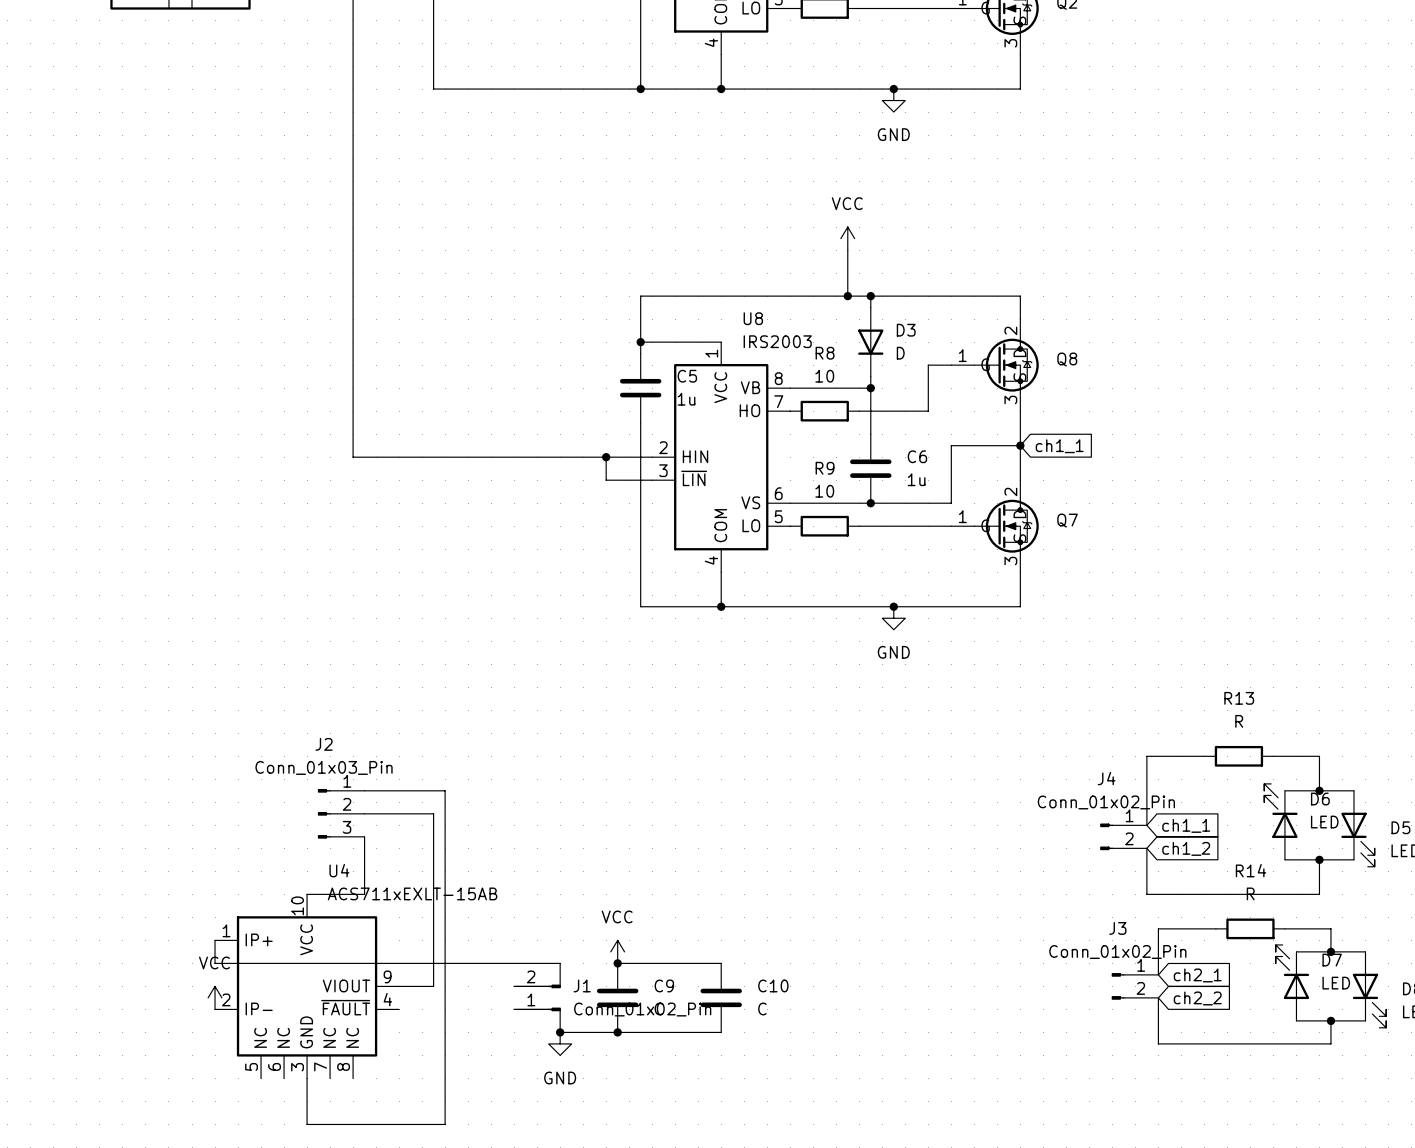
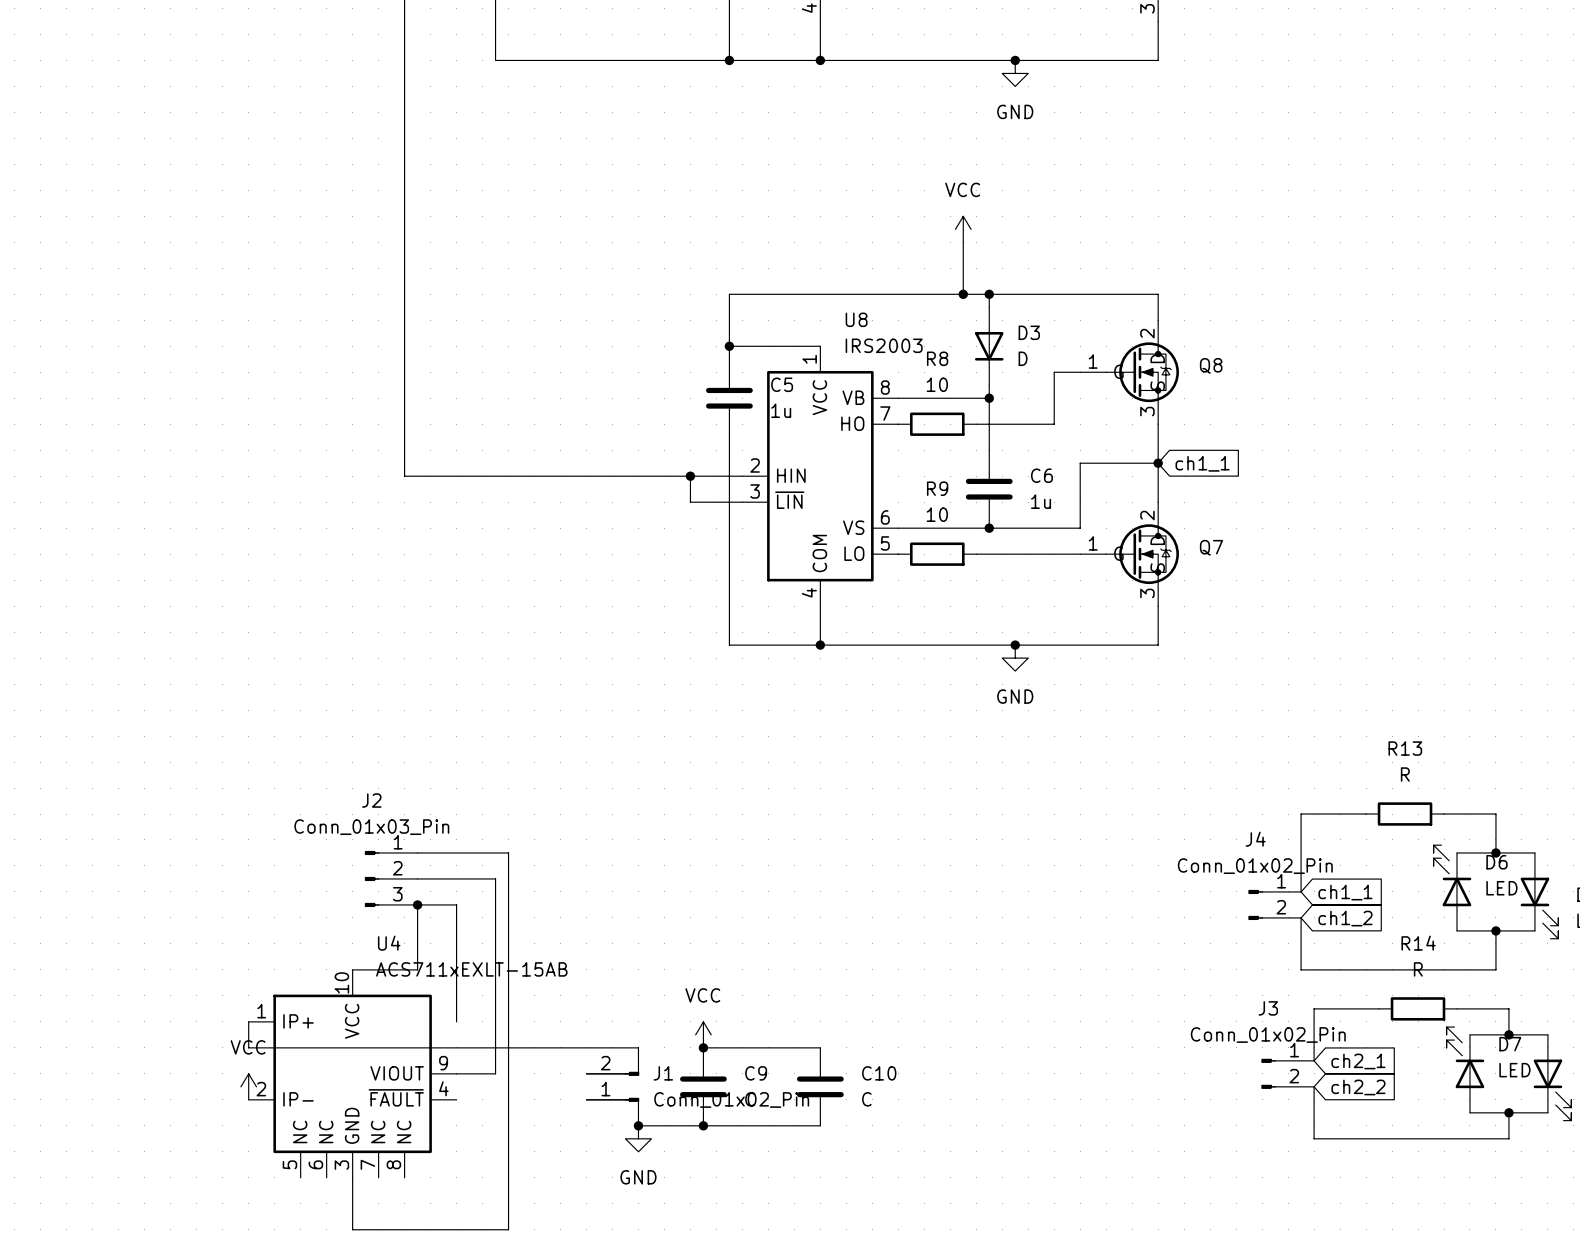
wire: none -> (417, 904) (456, 904) (456, 1021)
junction: none -> (417, 904)

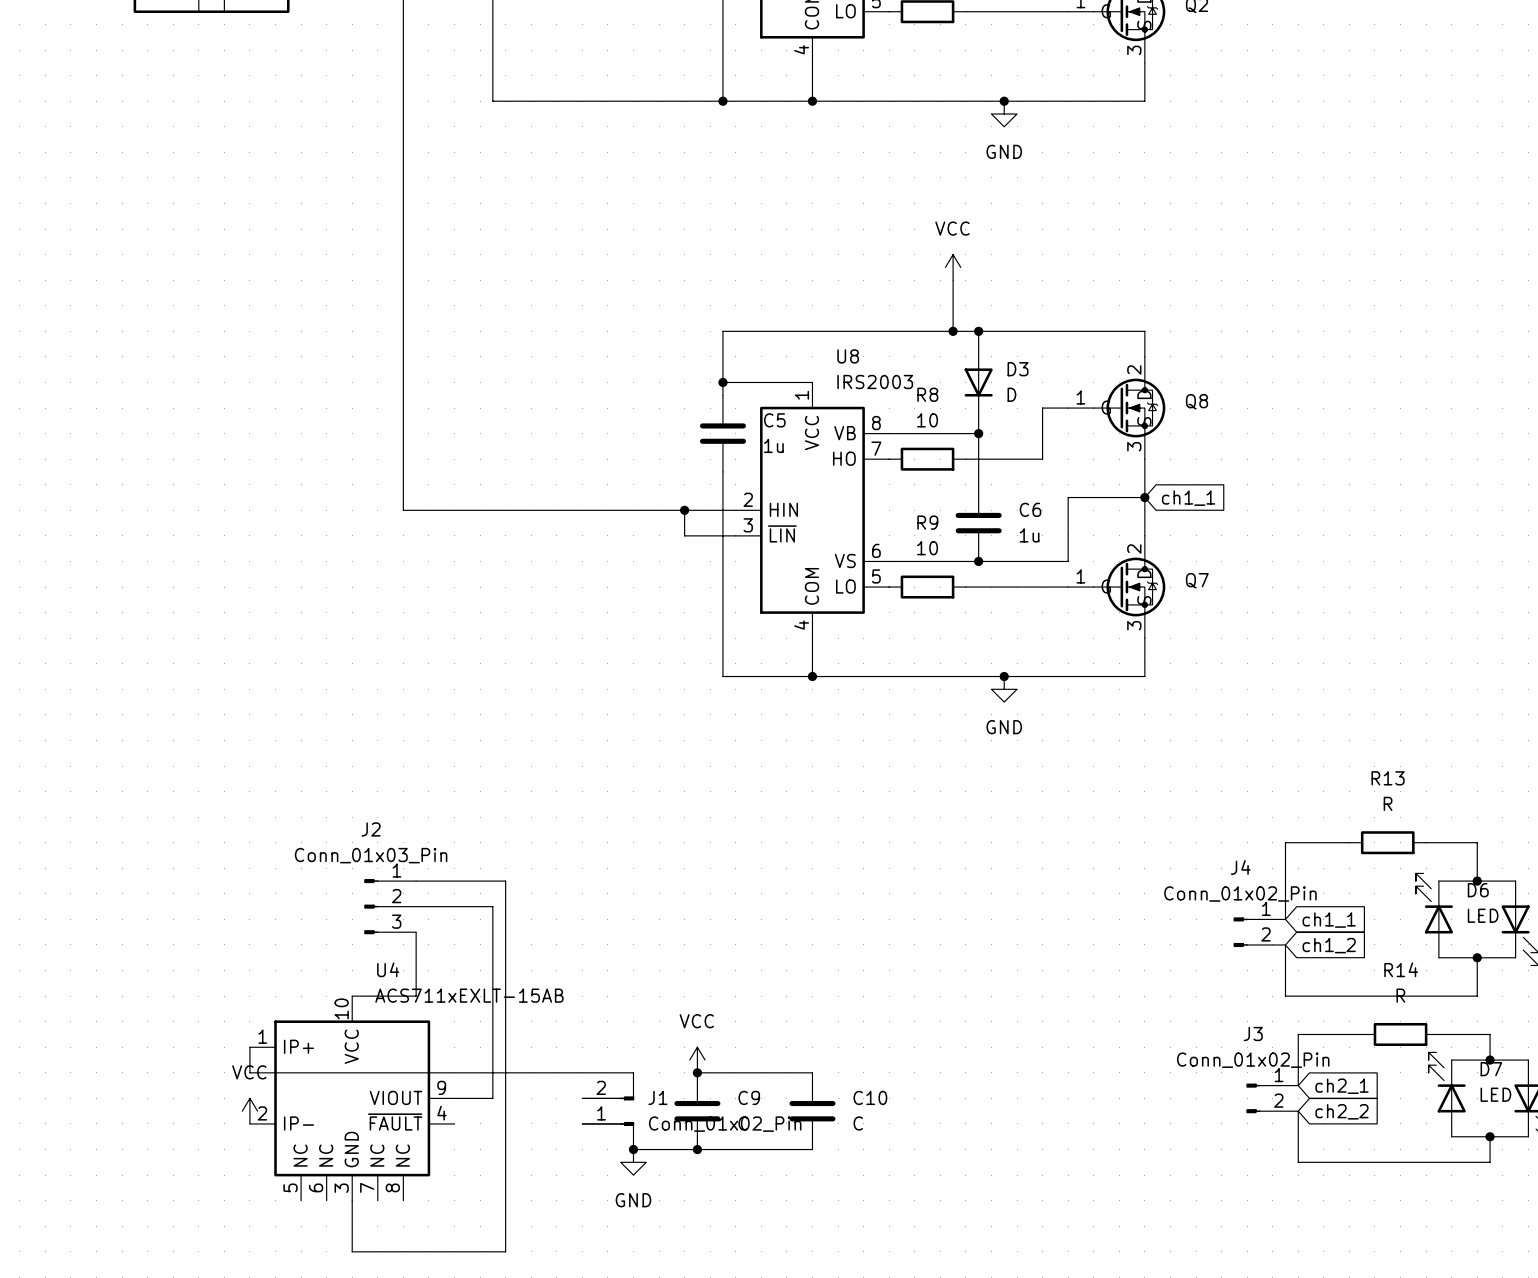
wire: (417, 904) (456, 904) (456, 1021) -> none
junction: (417, 904) -> none

